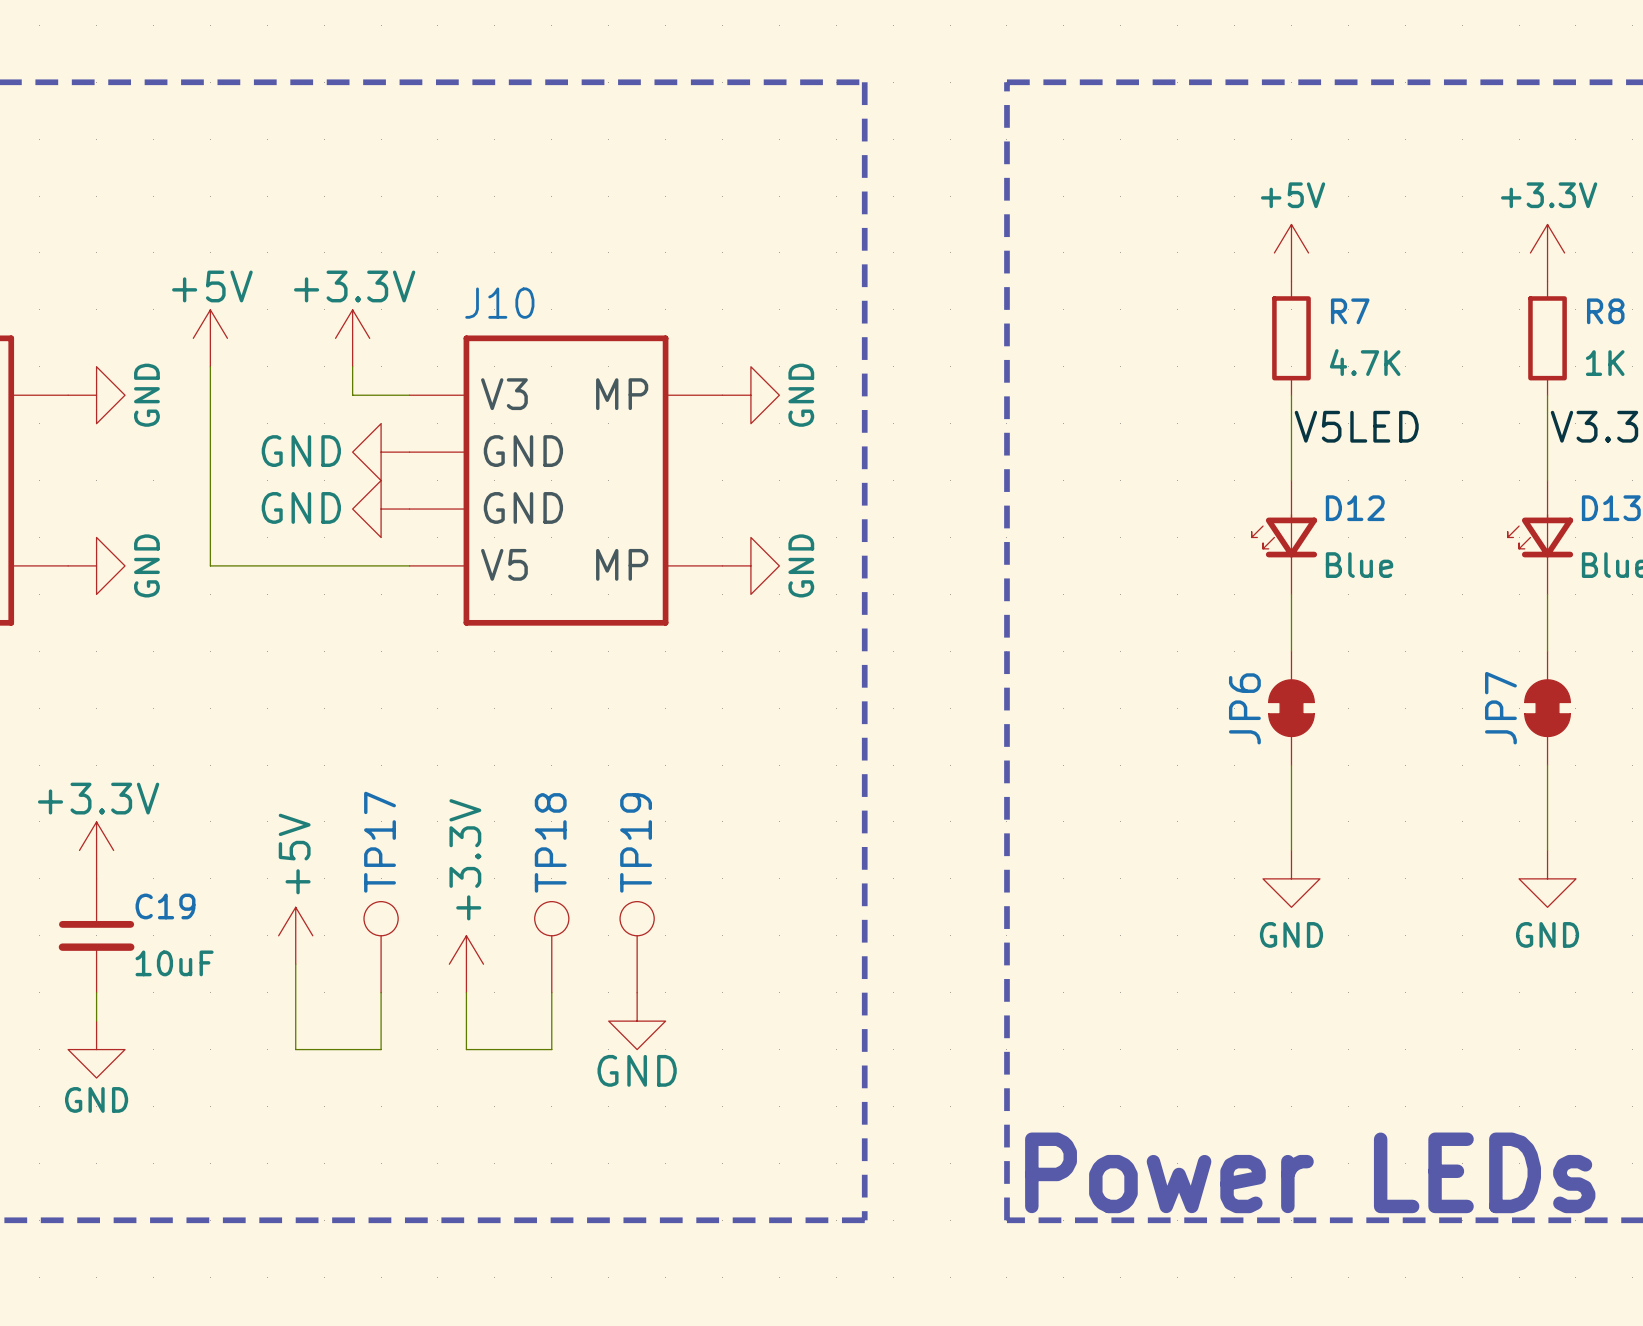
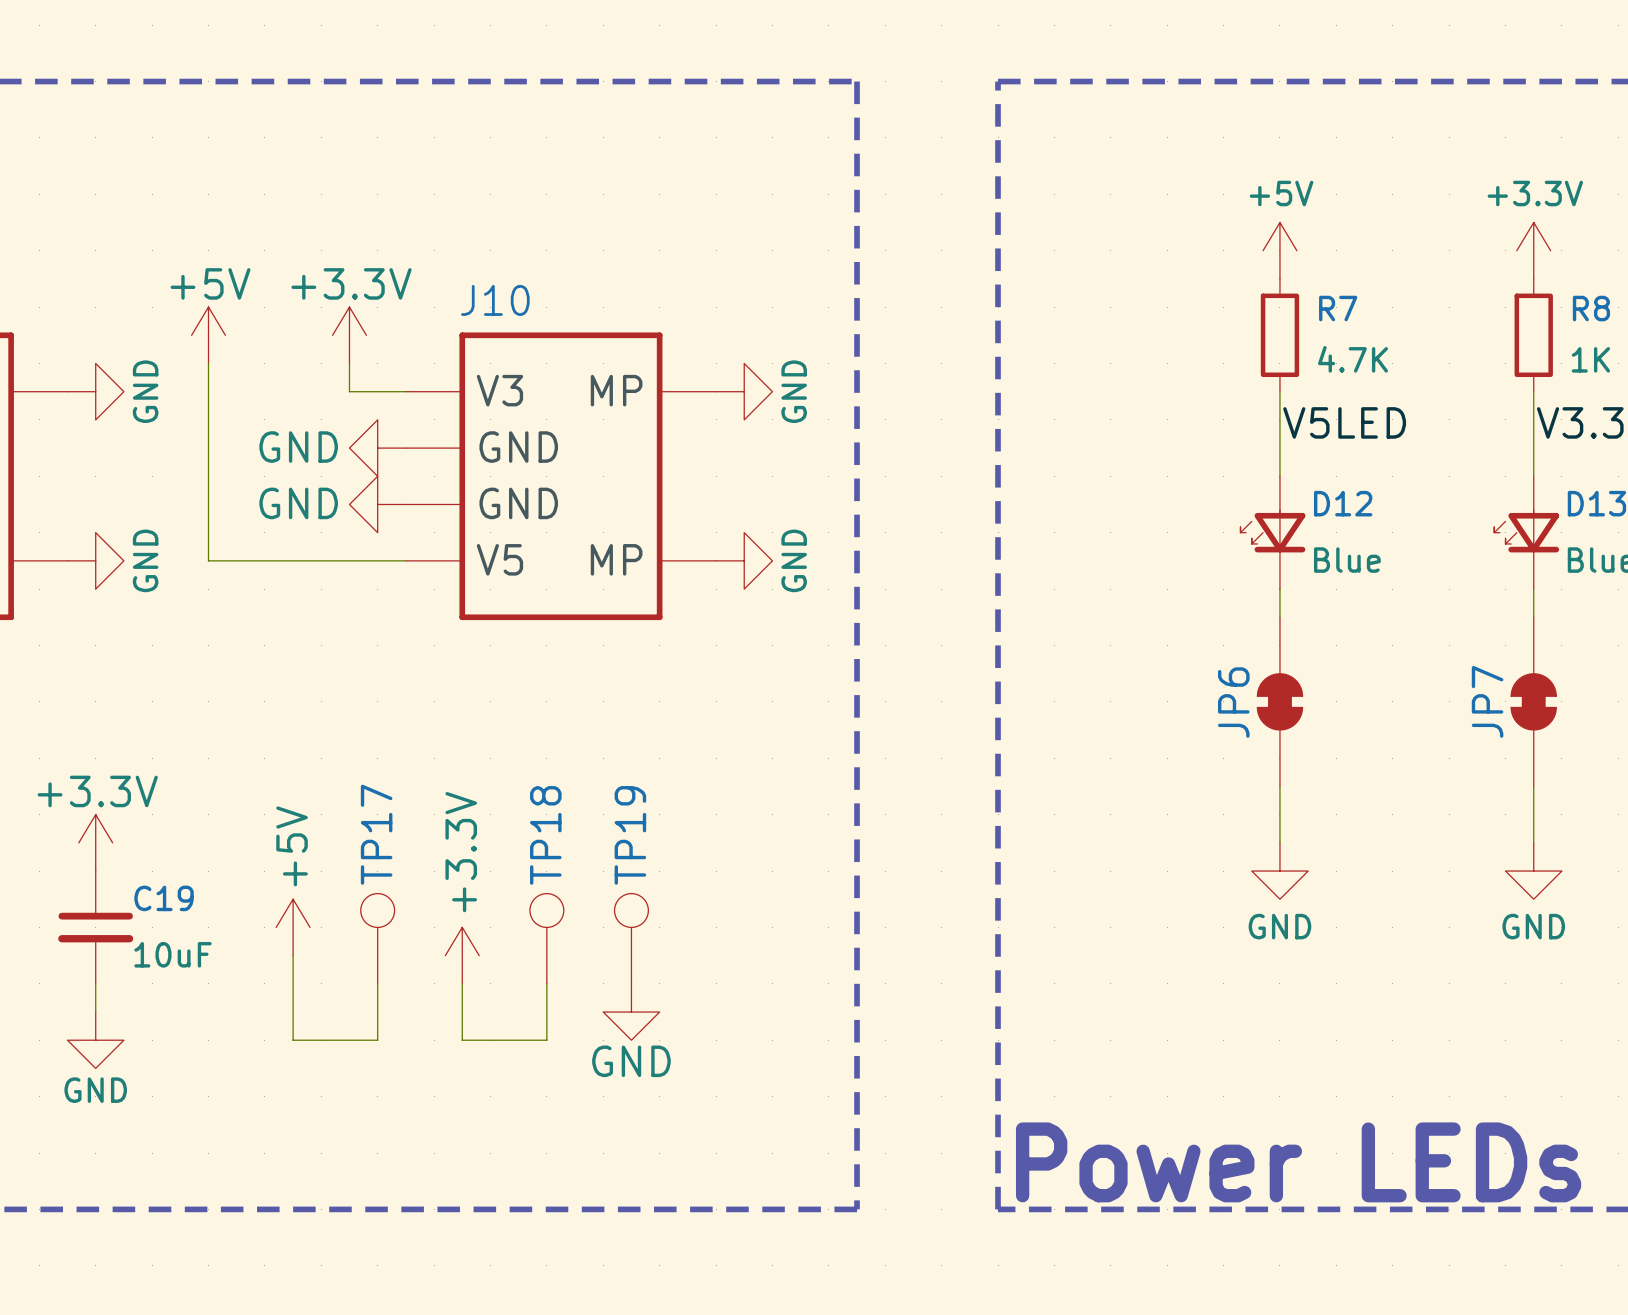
JP6 symbol: [1268, 651, 1315, 766] -> [1257, 617, 1303, 787]
JP7 symbol: [1524, 651, 1571, 766] -> [1511, 617, 1557, 787]

